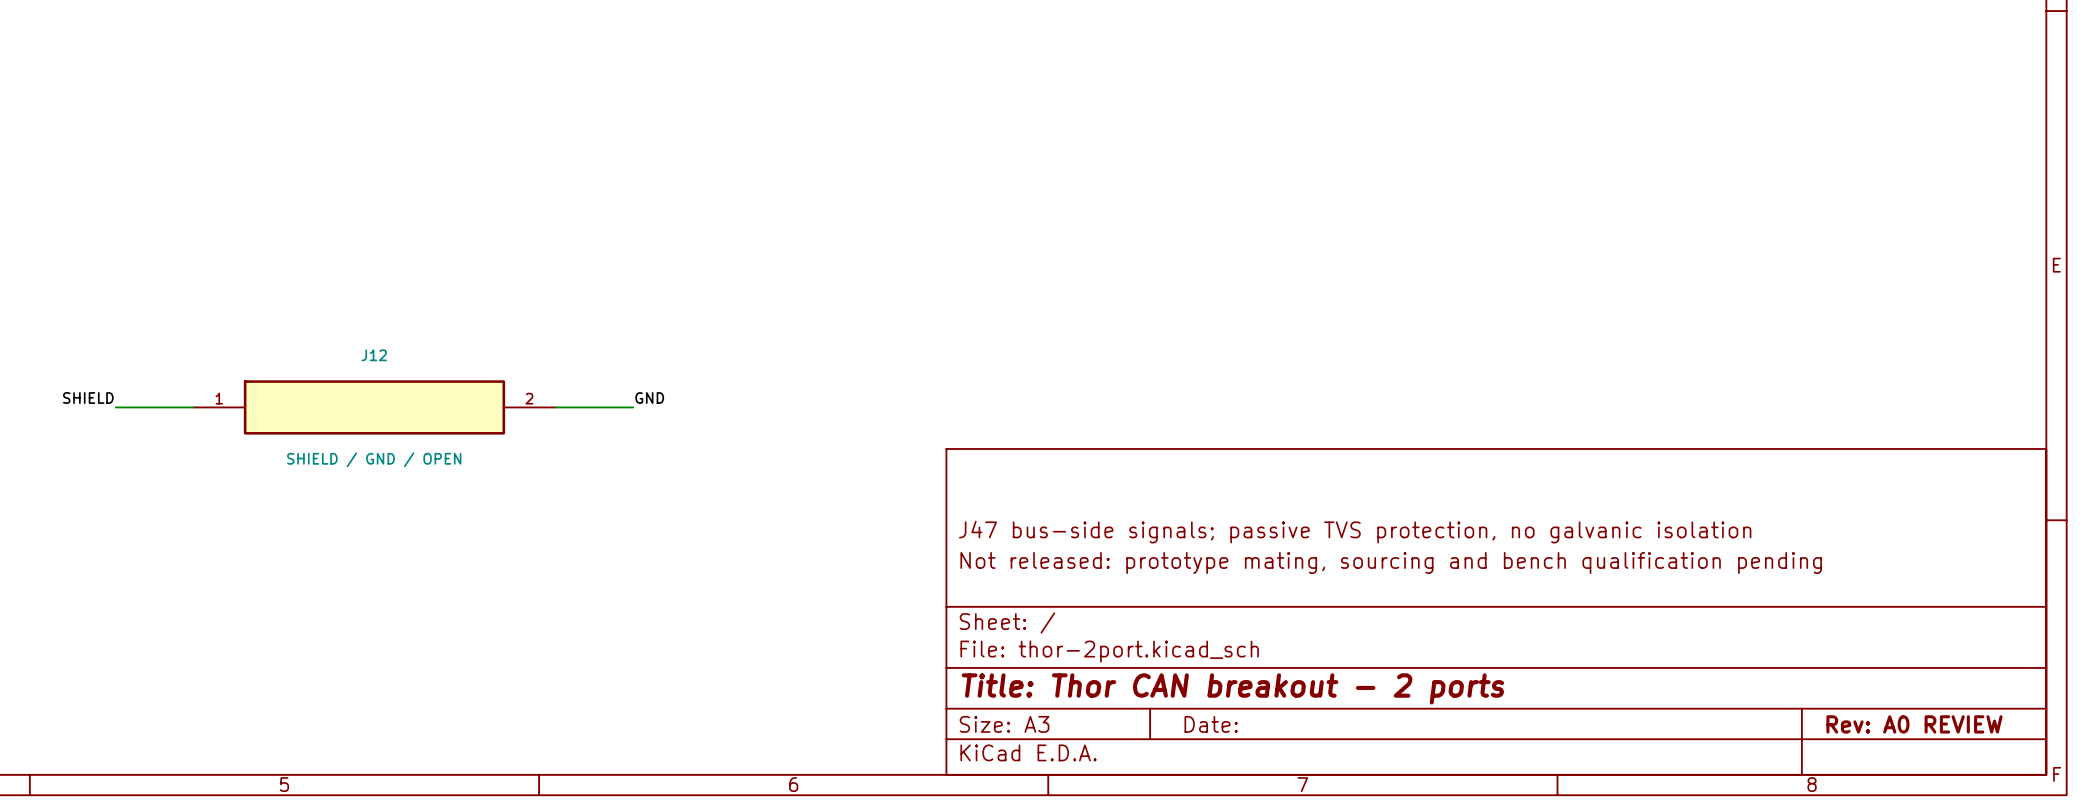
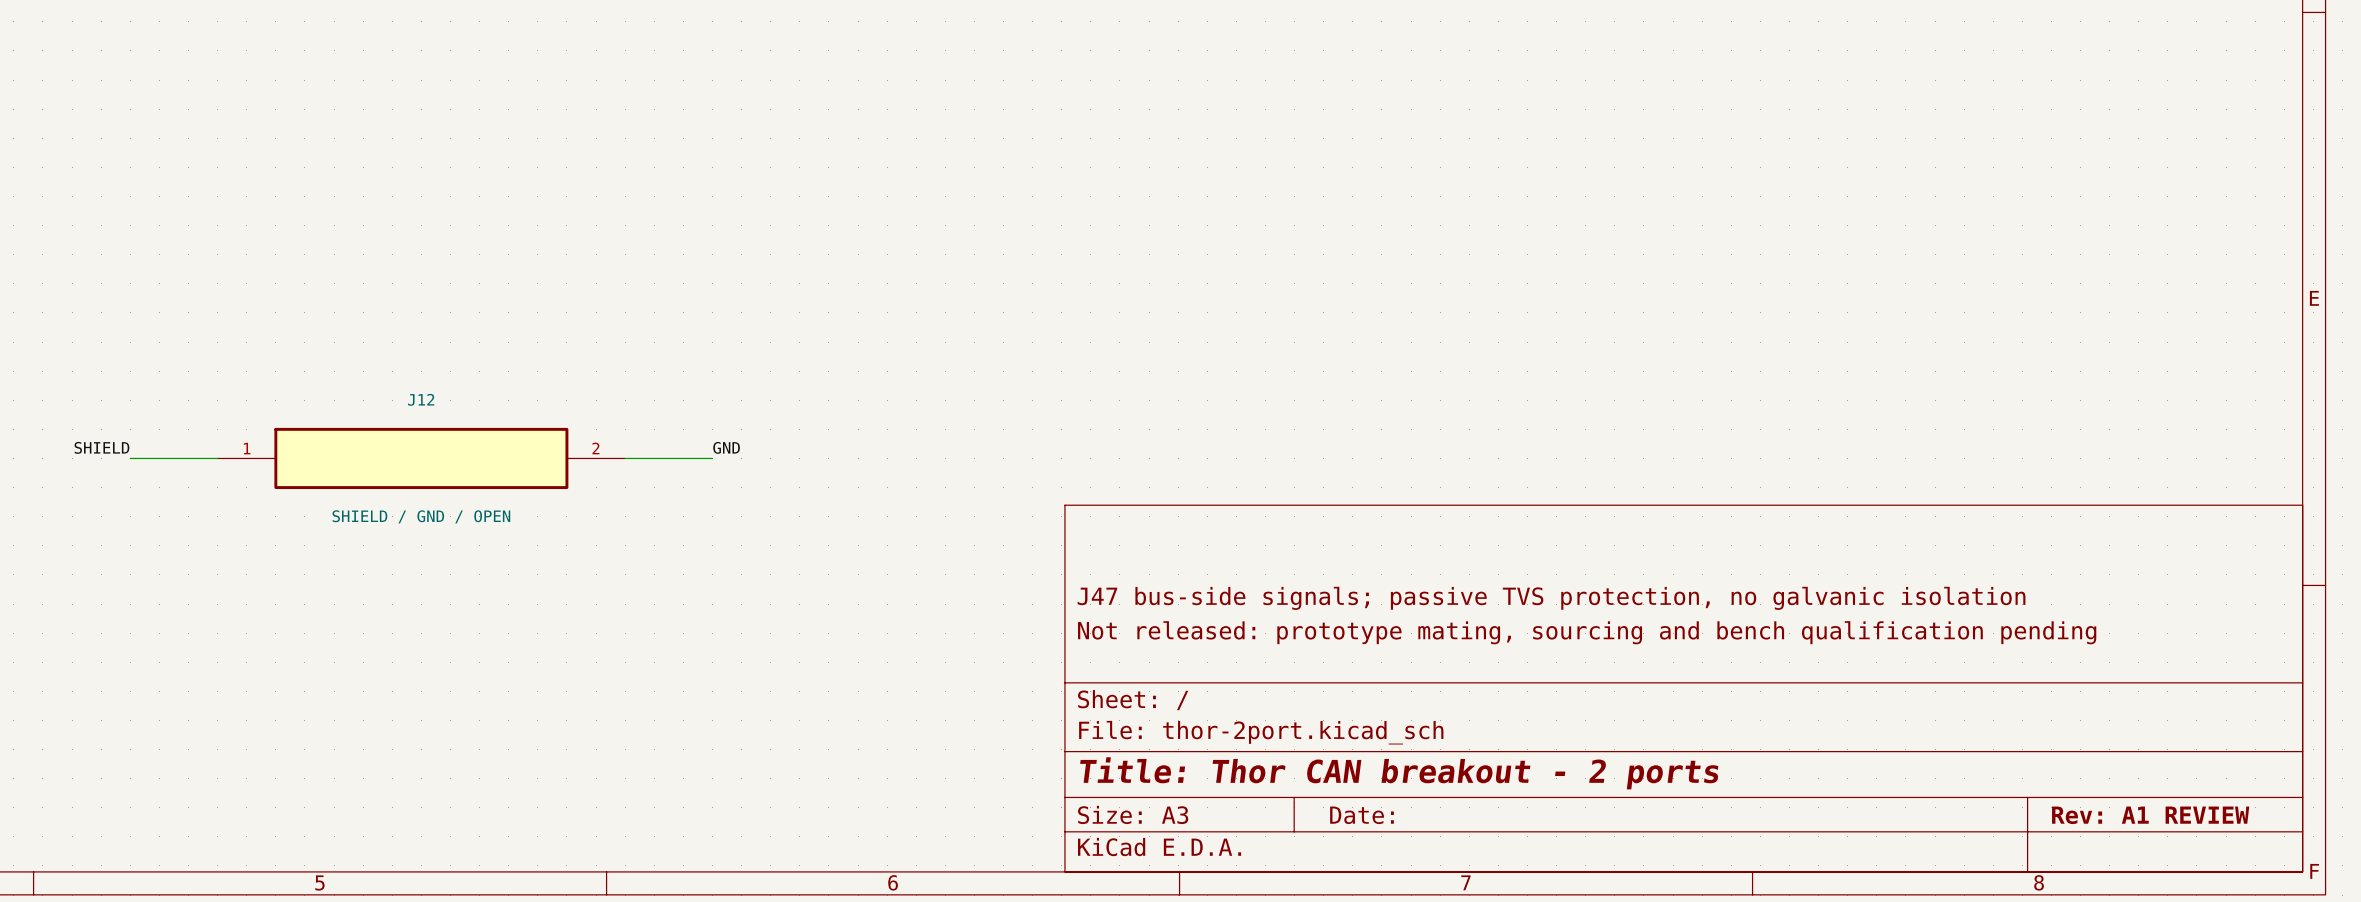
title block: Rev: A0 REVIEW (1914, 724) -> Rev: A1 REVIEW (2150, 815)

